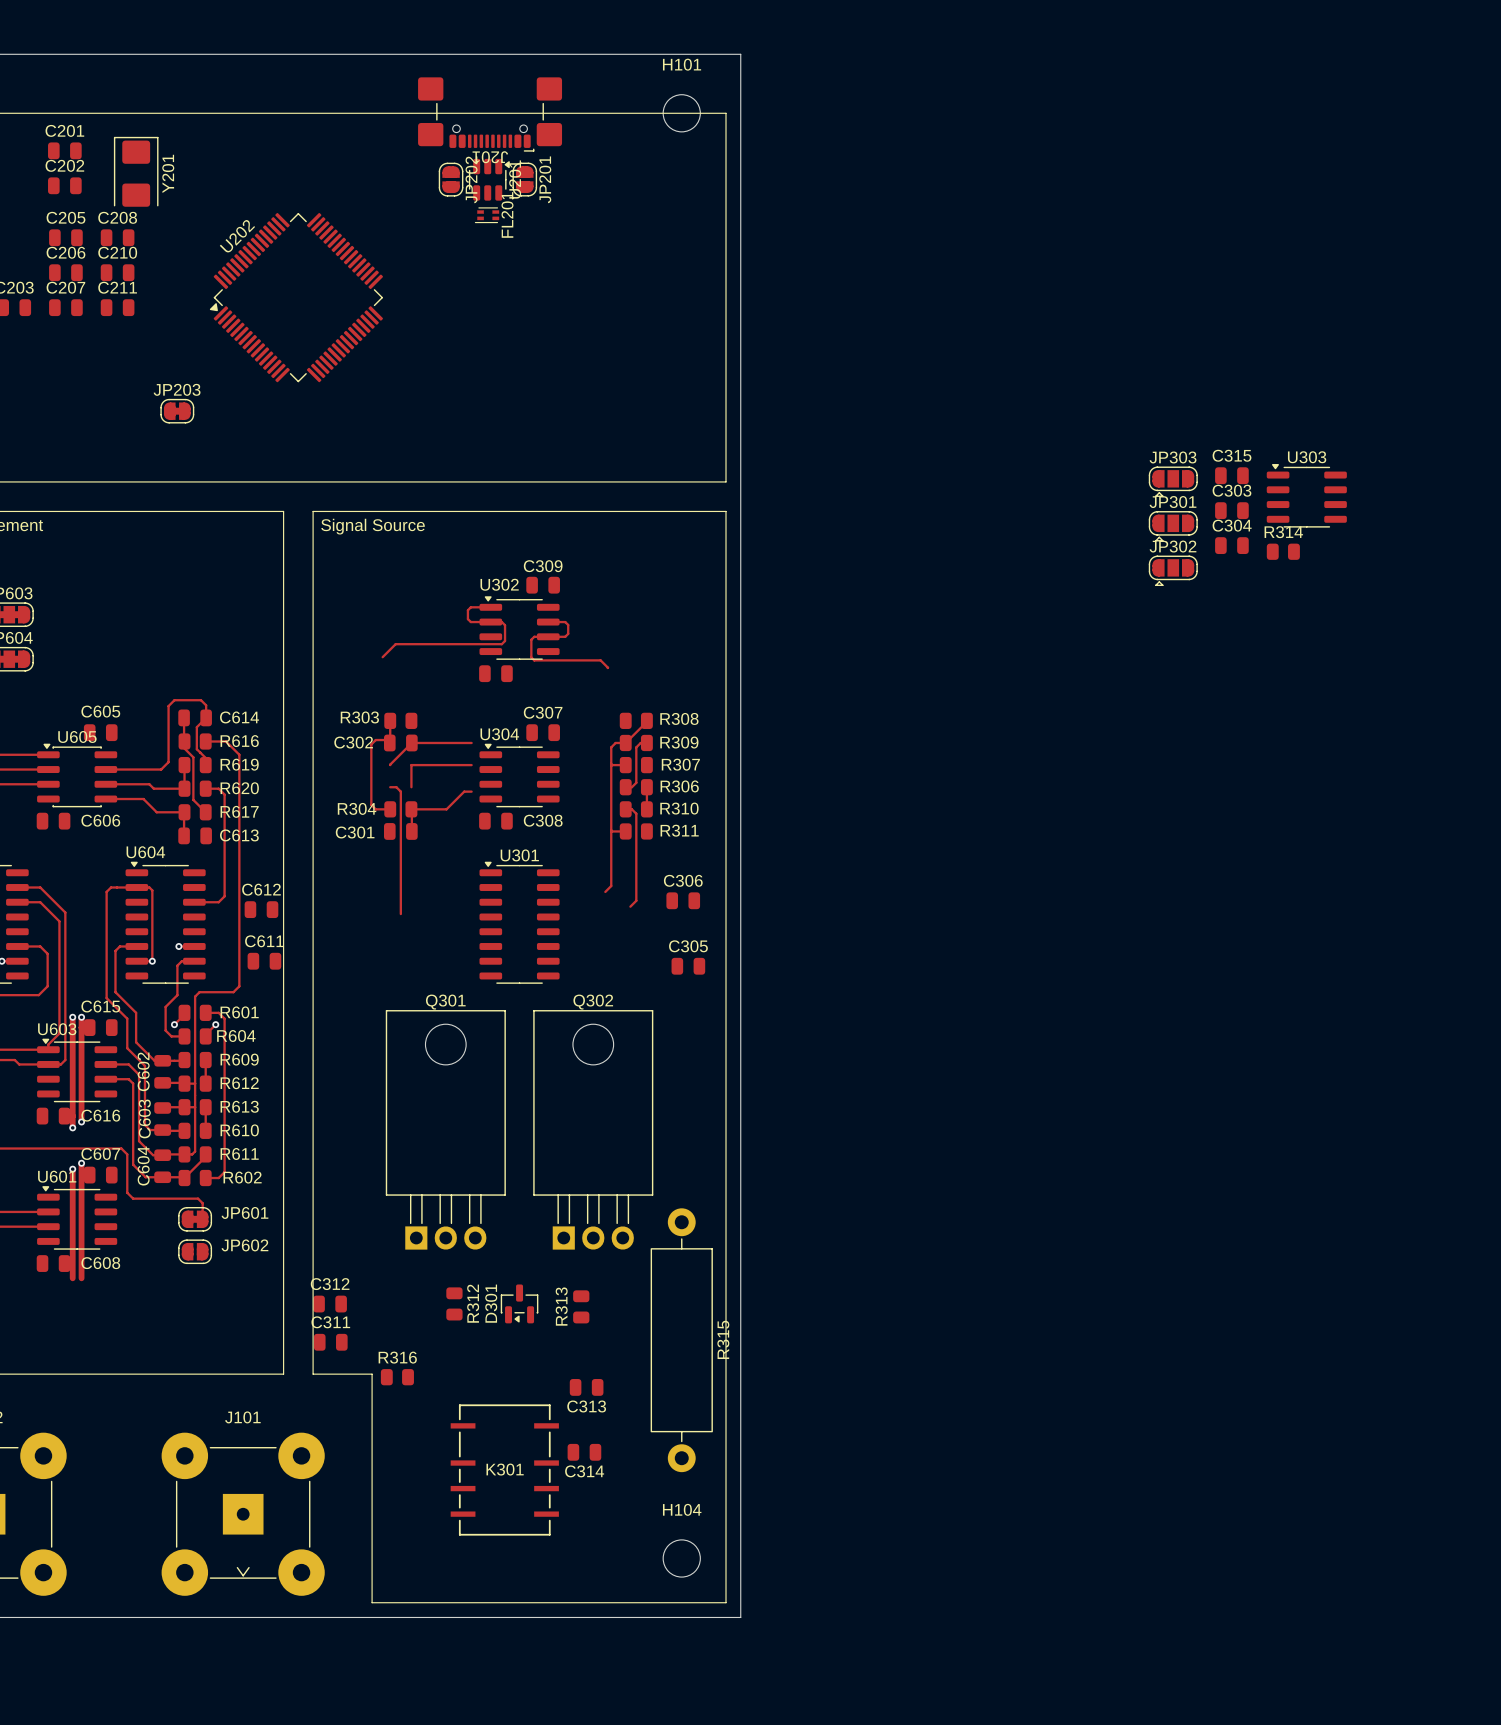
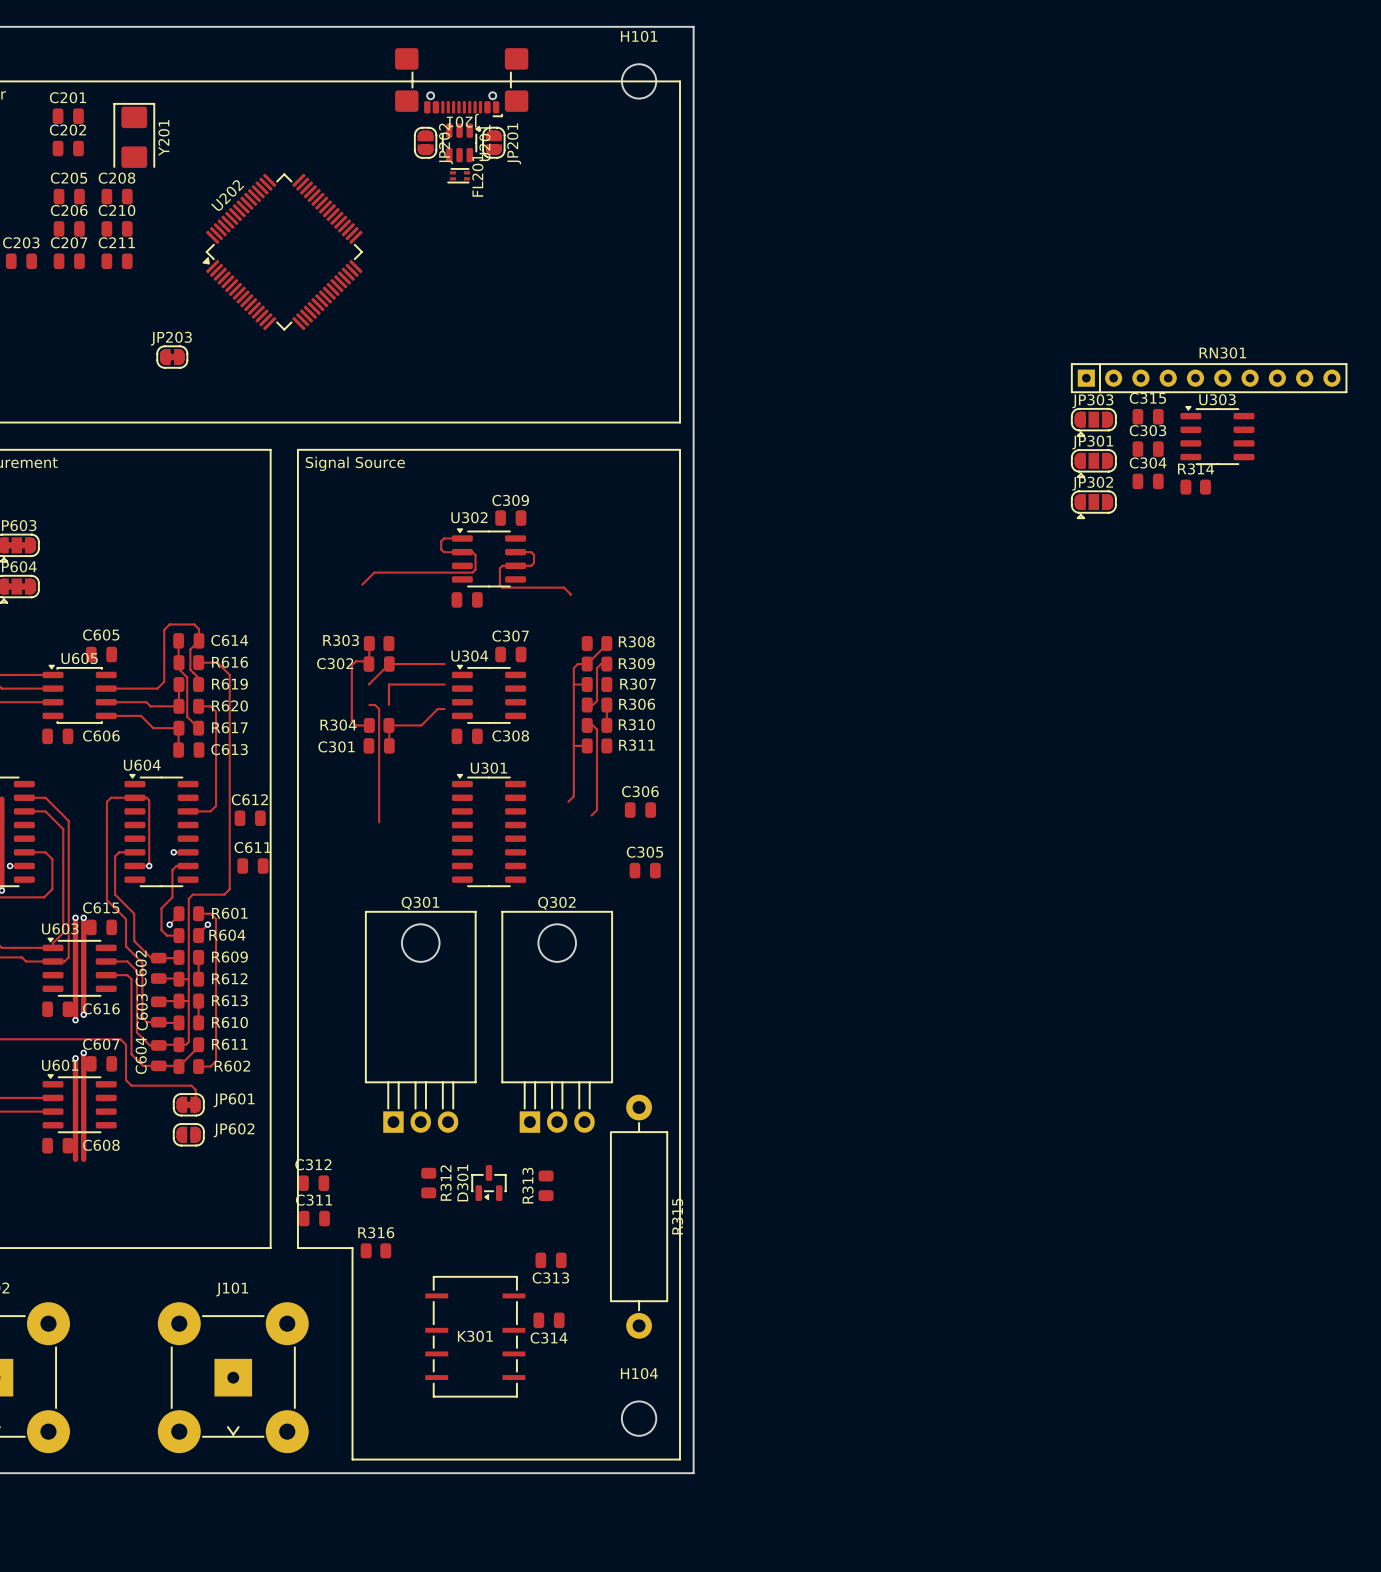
RN301: none -> (1209, 378)

